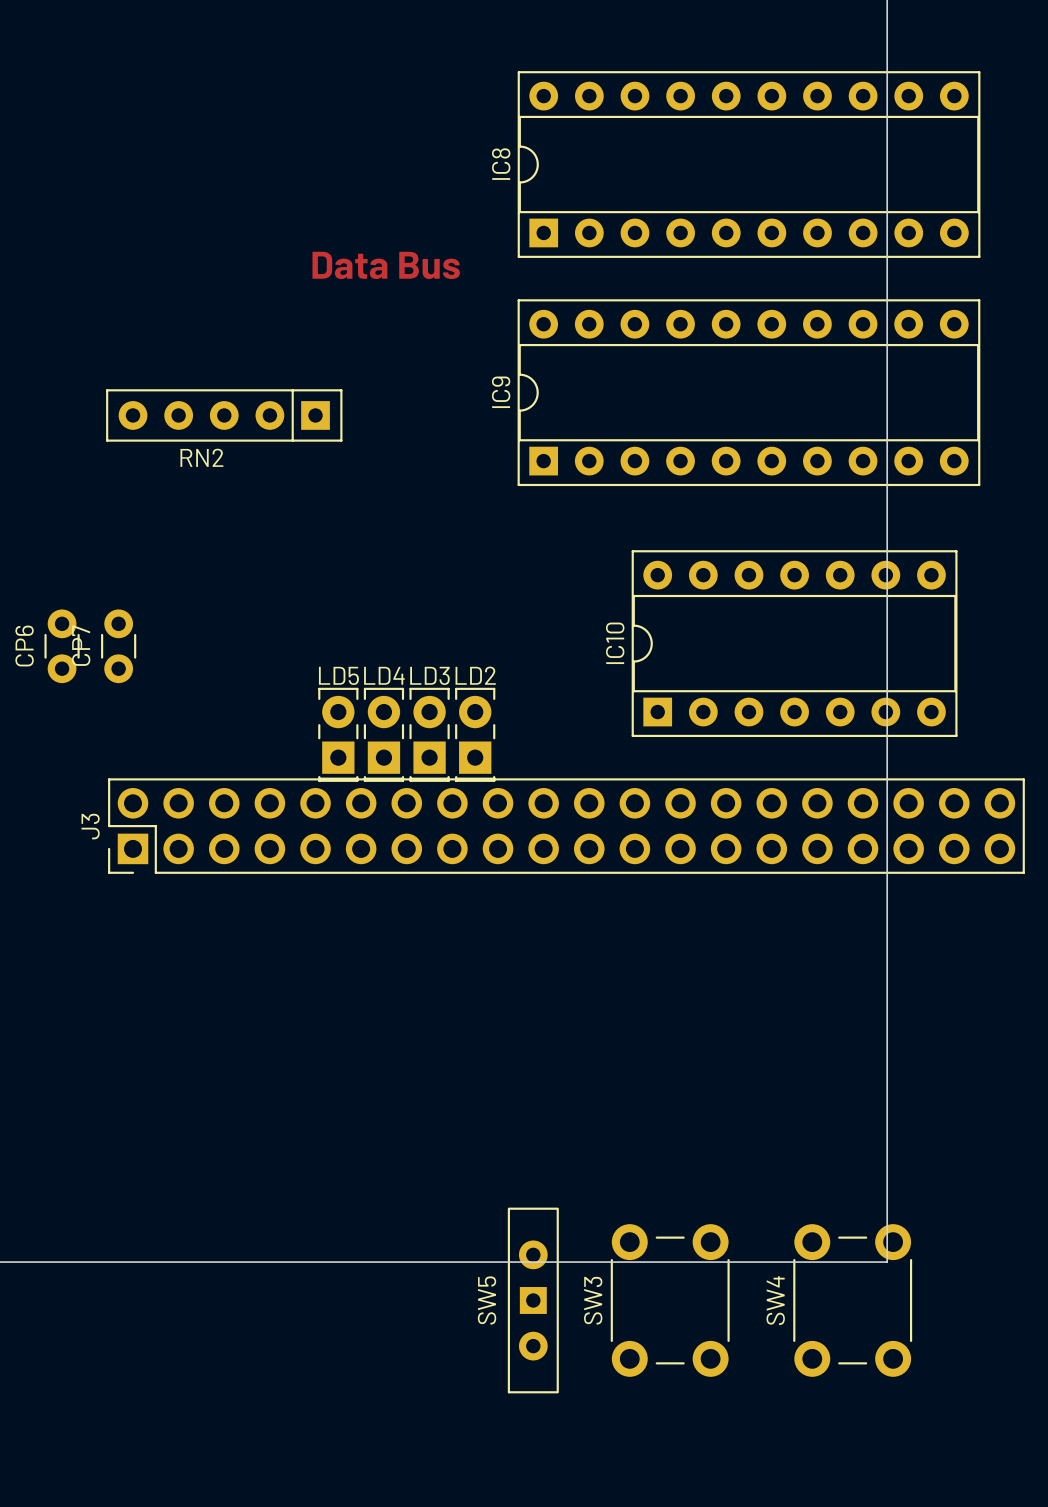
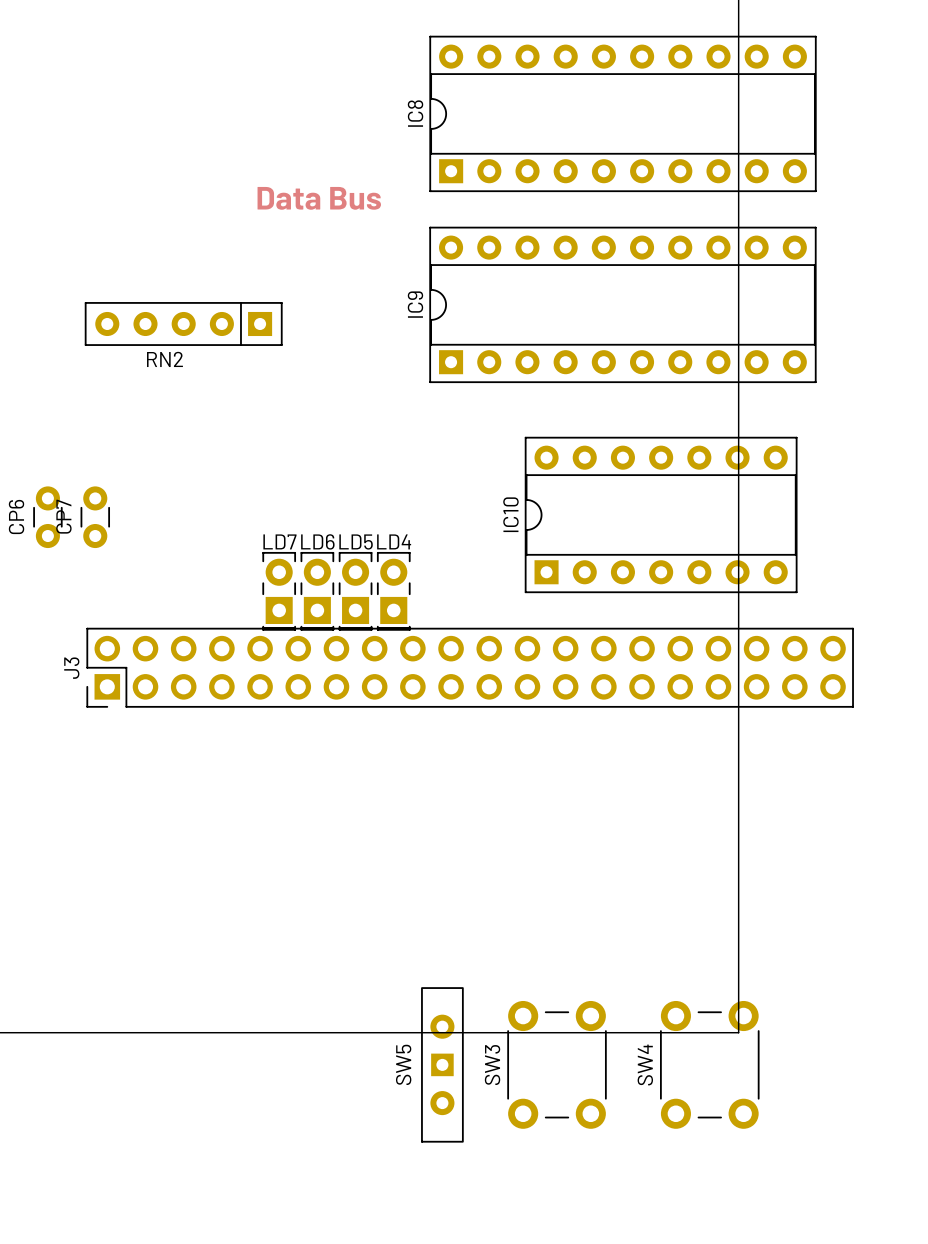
LD5 name: LD5 (338, 675) -> LD7 (279, 541)
LD4 name: LD4 (384, 675) -> LD6 (317, 541)
LD3 name: LD3 (429, 675) -> LD5 (356, 542)
LD2 name: LD2 (475, 675) -> LD4 (394, 541)

